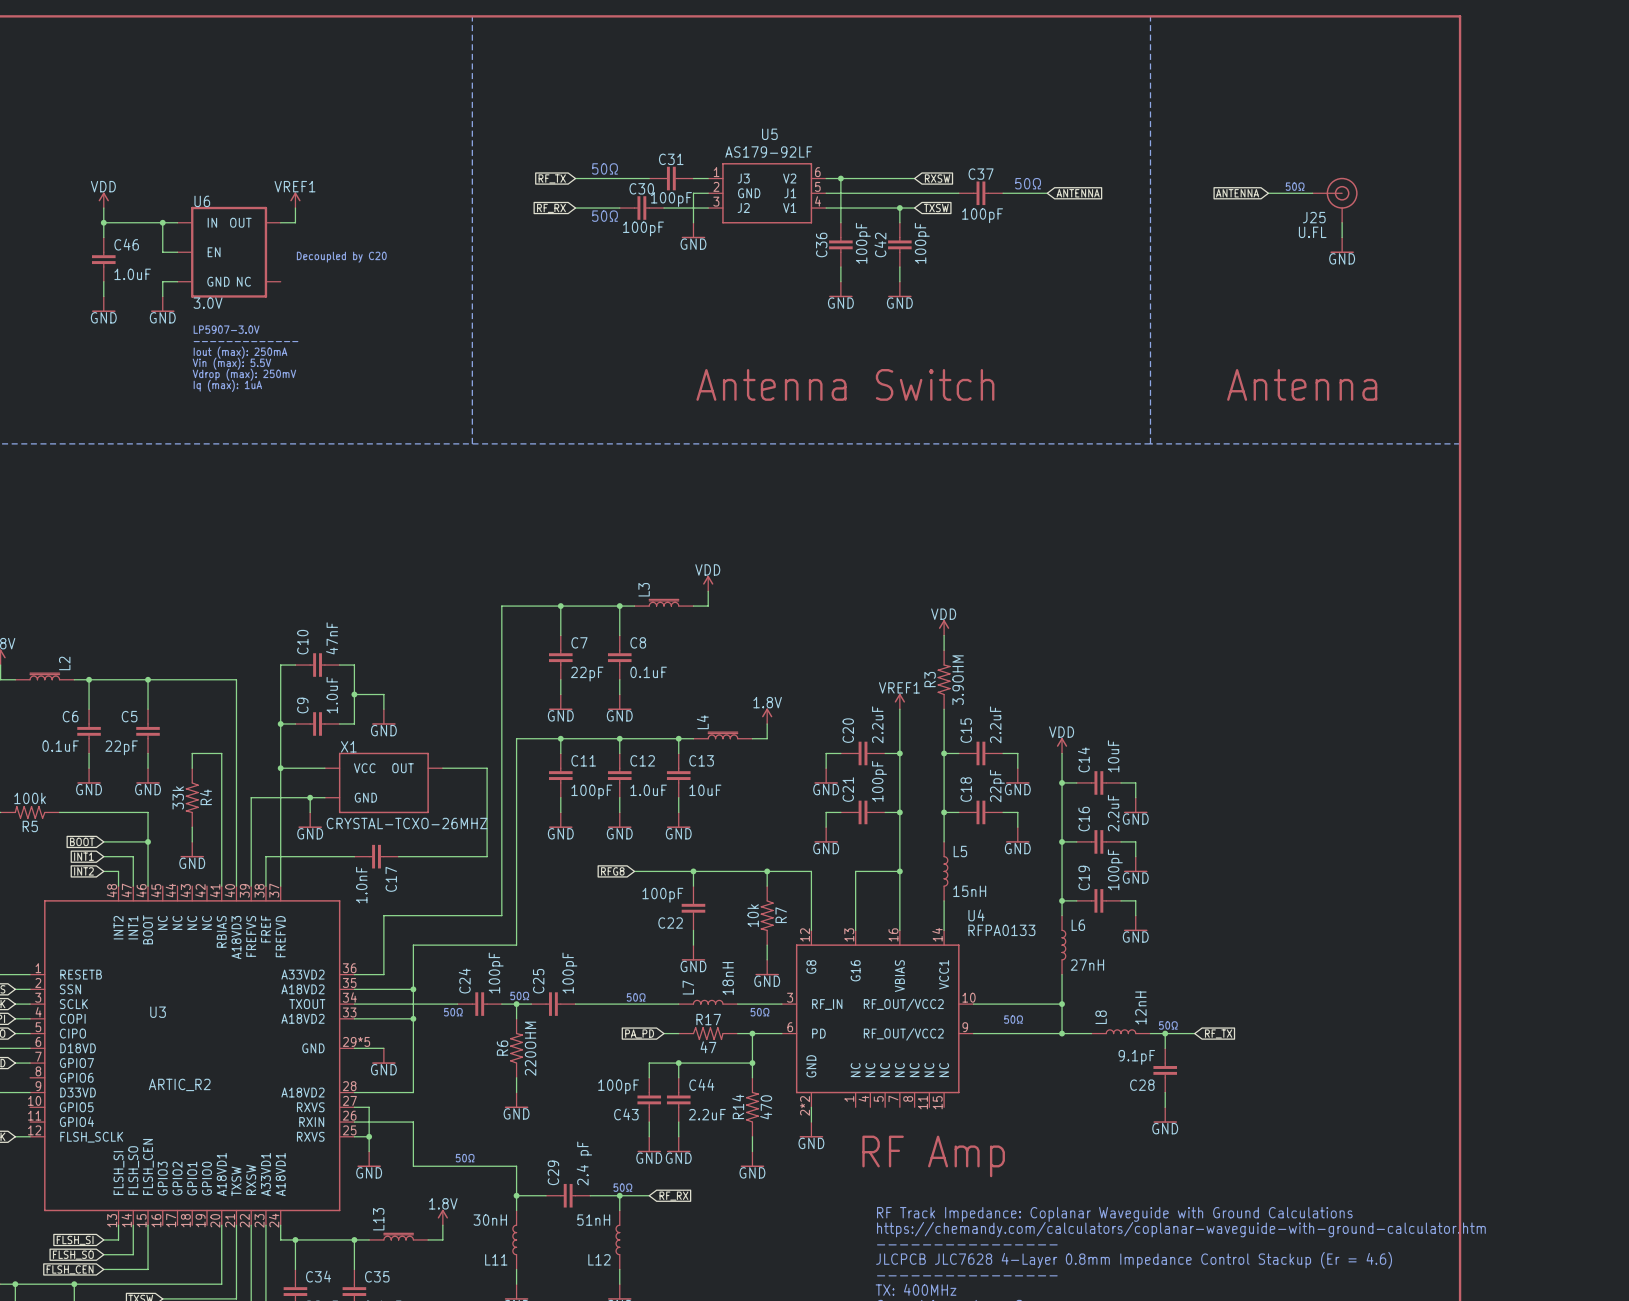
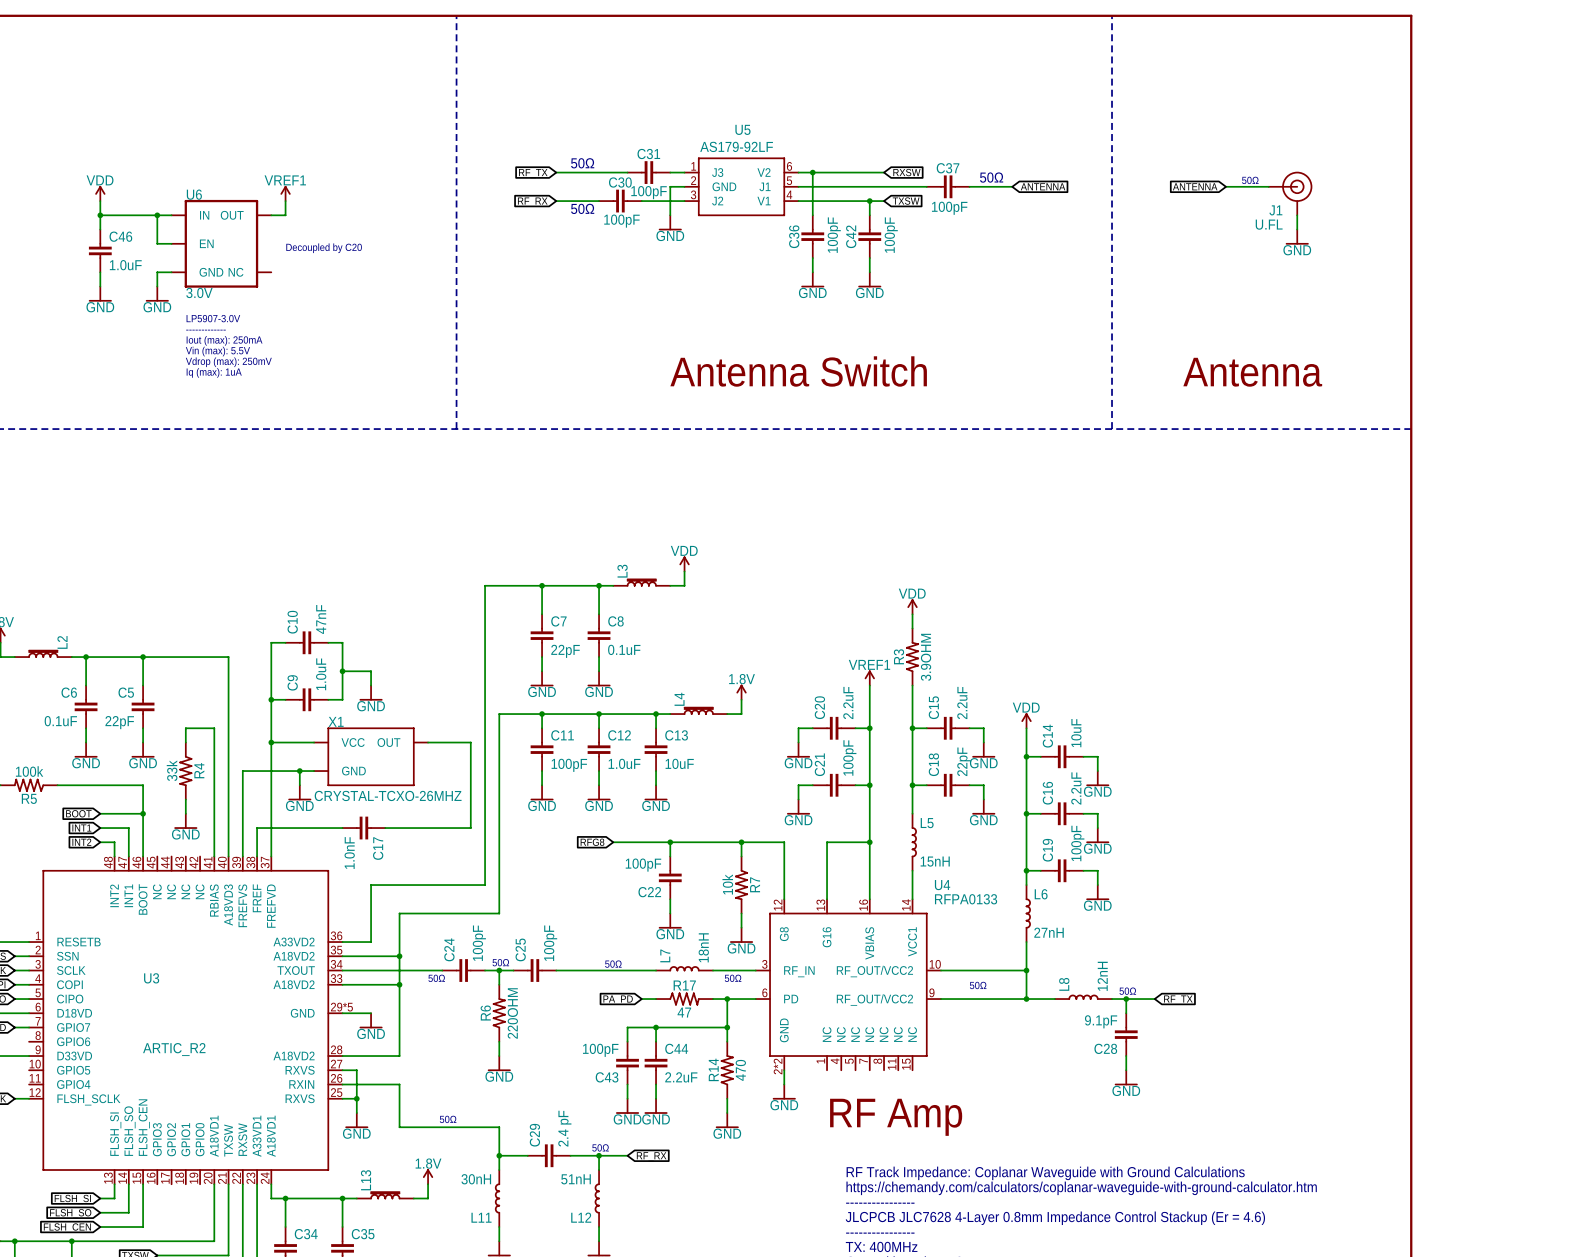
J25 name: J25 (1314, 217) -> J1 (1275, 210)

